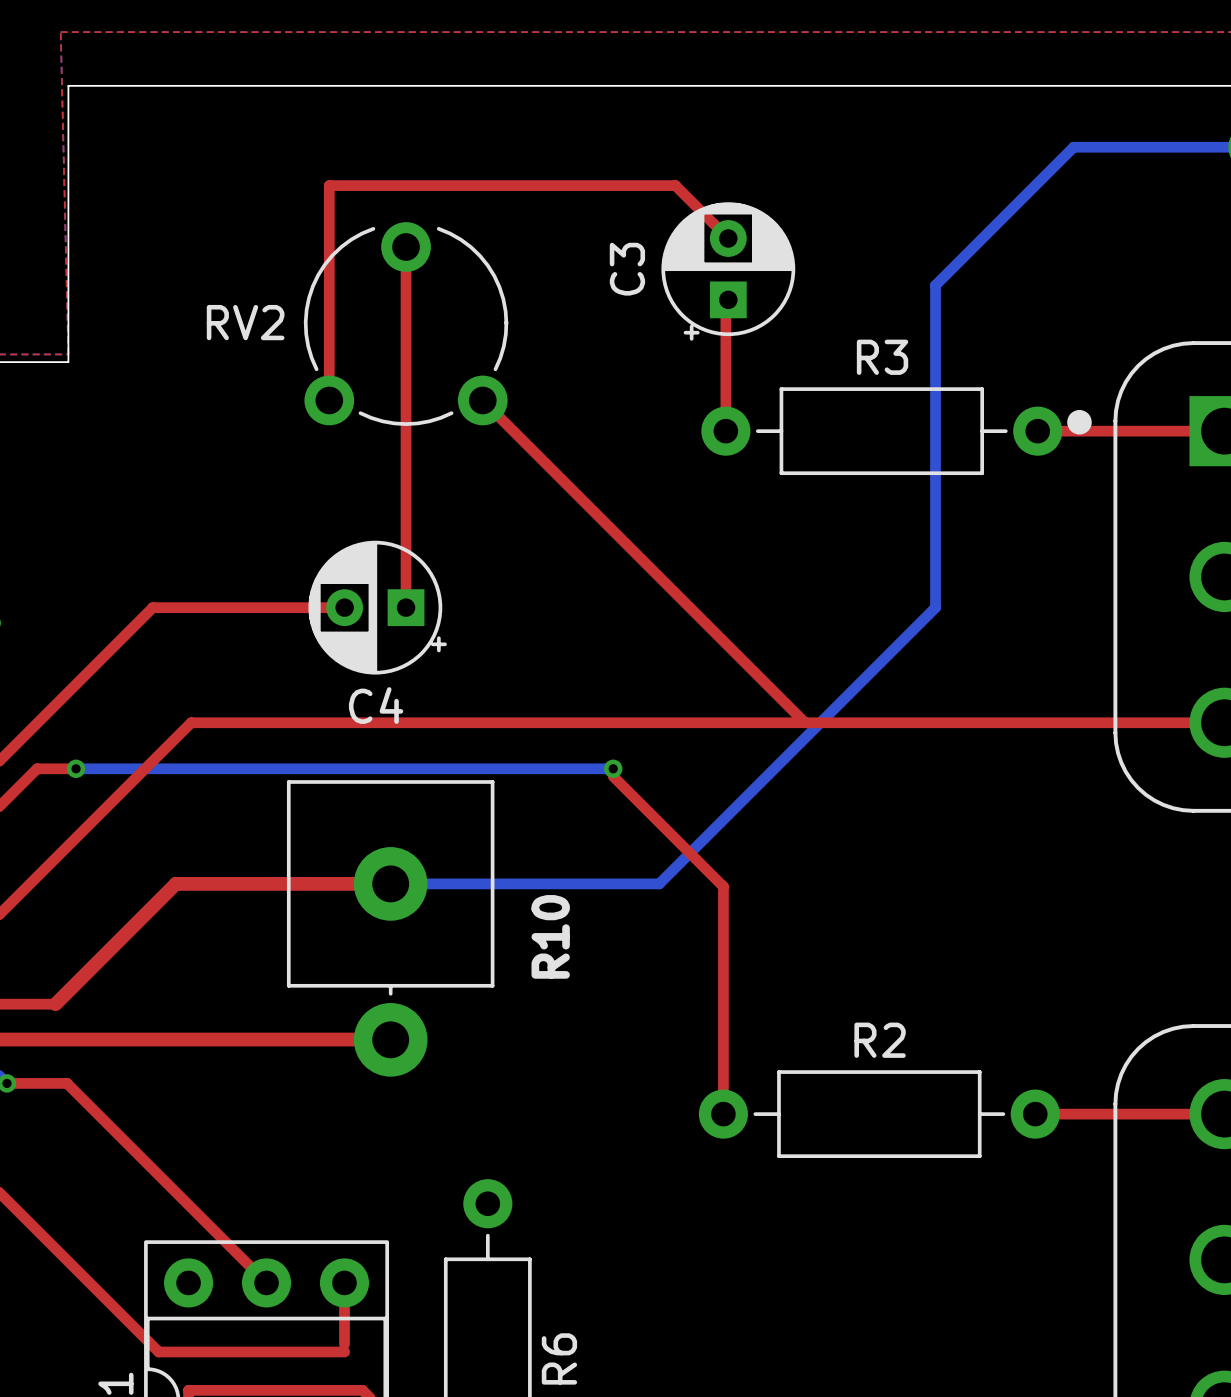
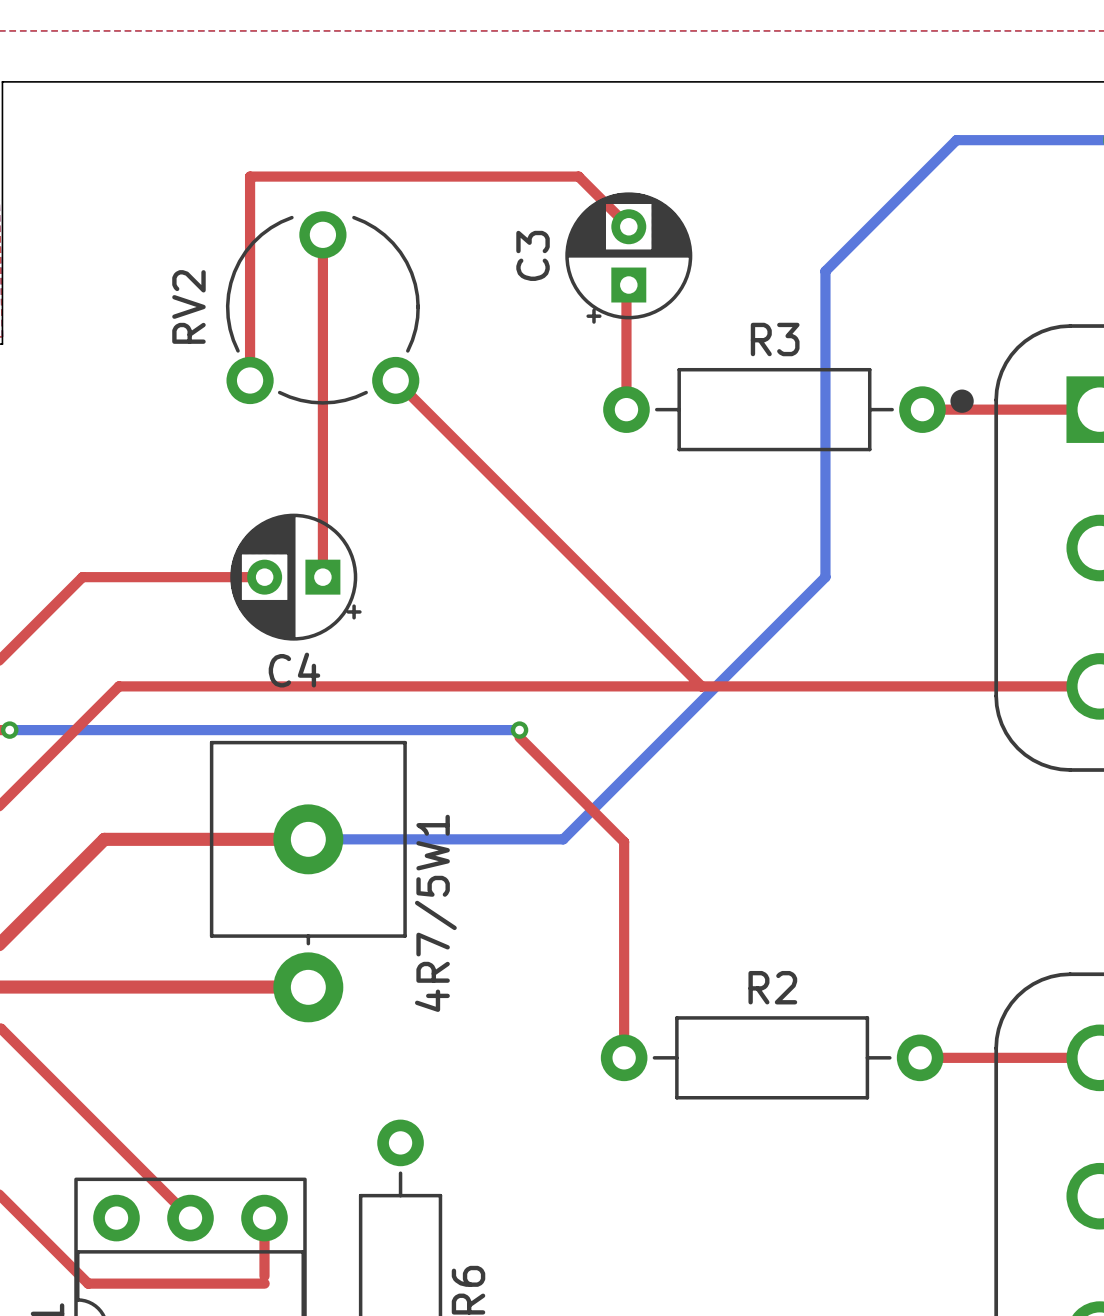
RV2 name rotation: 0° (245, 322) -> 90° counterclockwise (188, 306)
4R7/5W1 value: R10 (550, 936) -> none
4R7/5W1 name: none -> 4R7/5W1 (435, 913)

